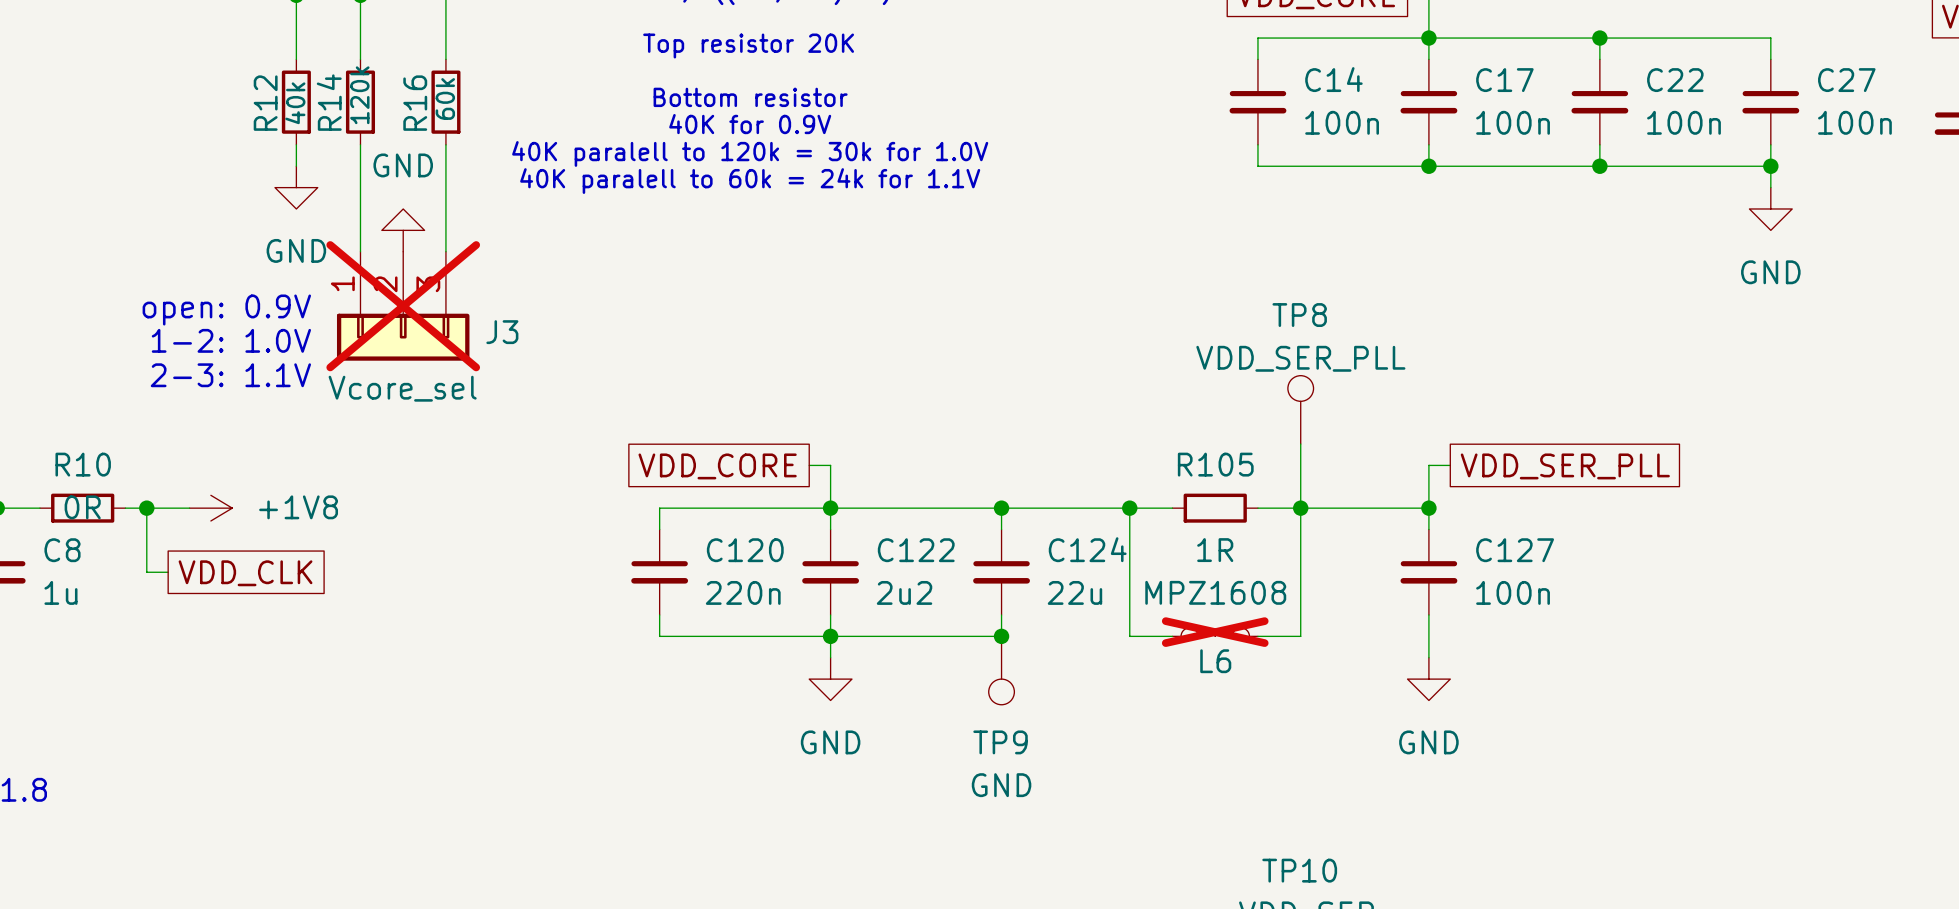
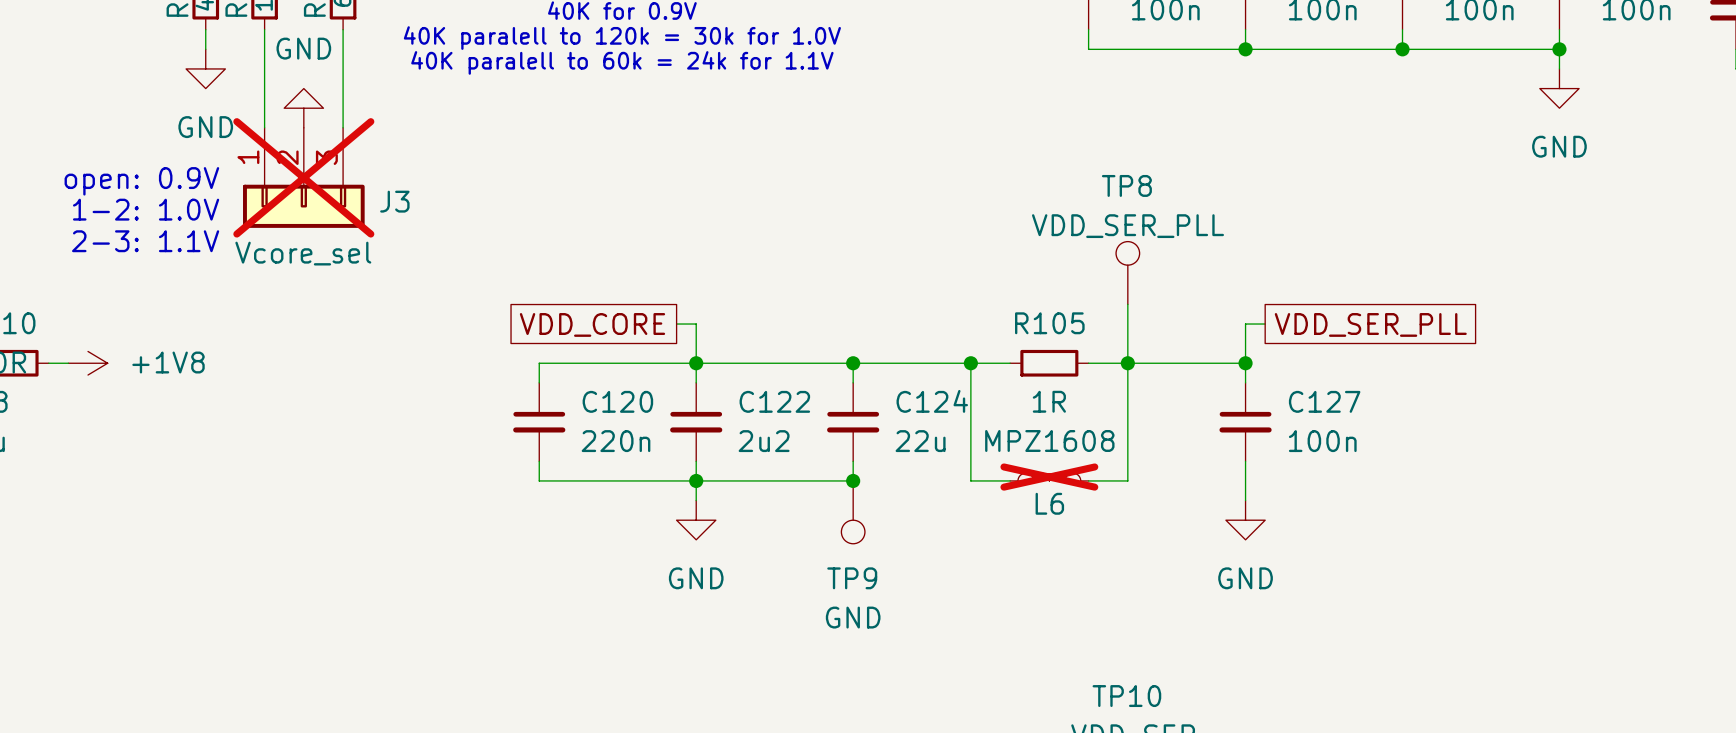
junction: (146, 508) -> none
wire: (189, 508) (146, 508) (146, 572) (168, 572) -> none
power symbol position: +1V8 (210, 508) -> +1V8 (88, 363)
global label: VDD_CLK (245, 573) -> none

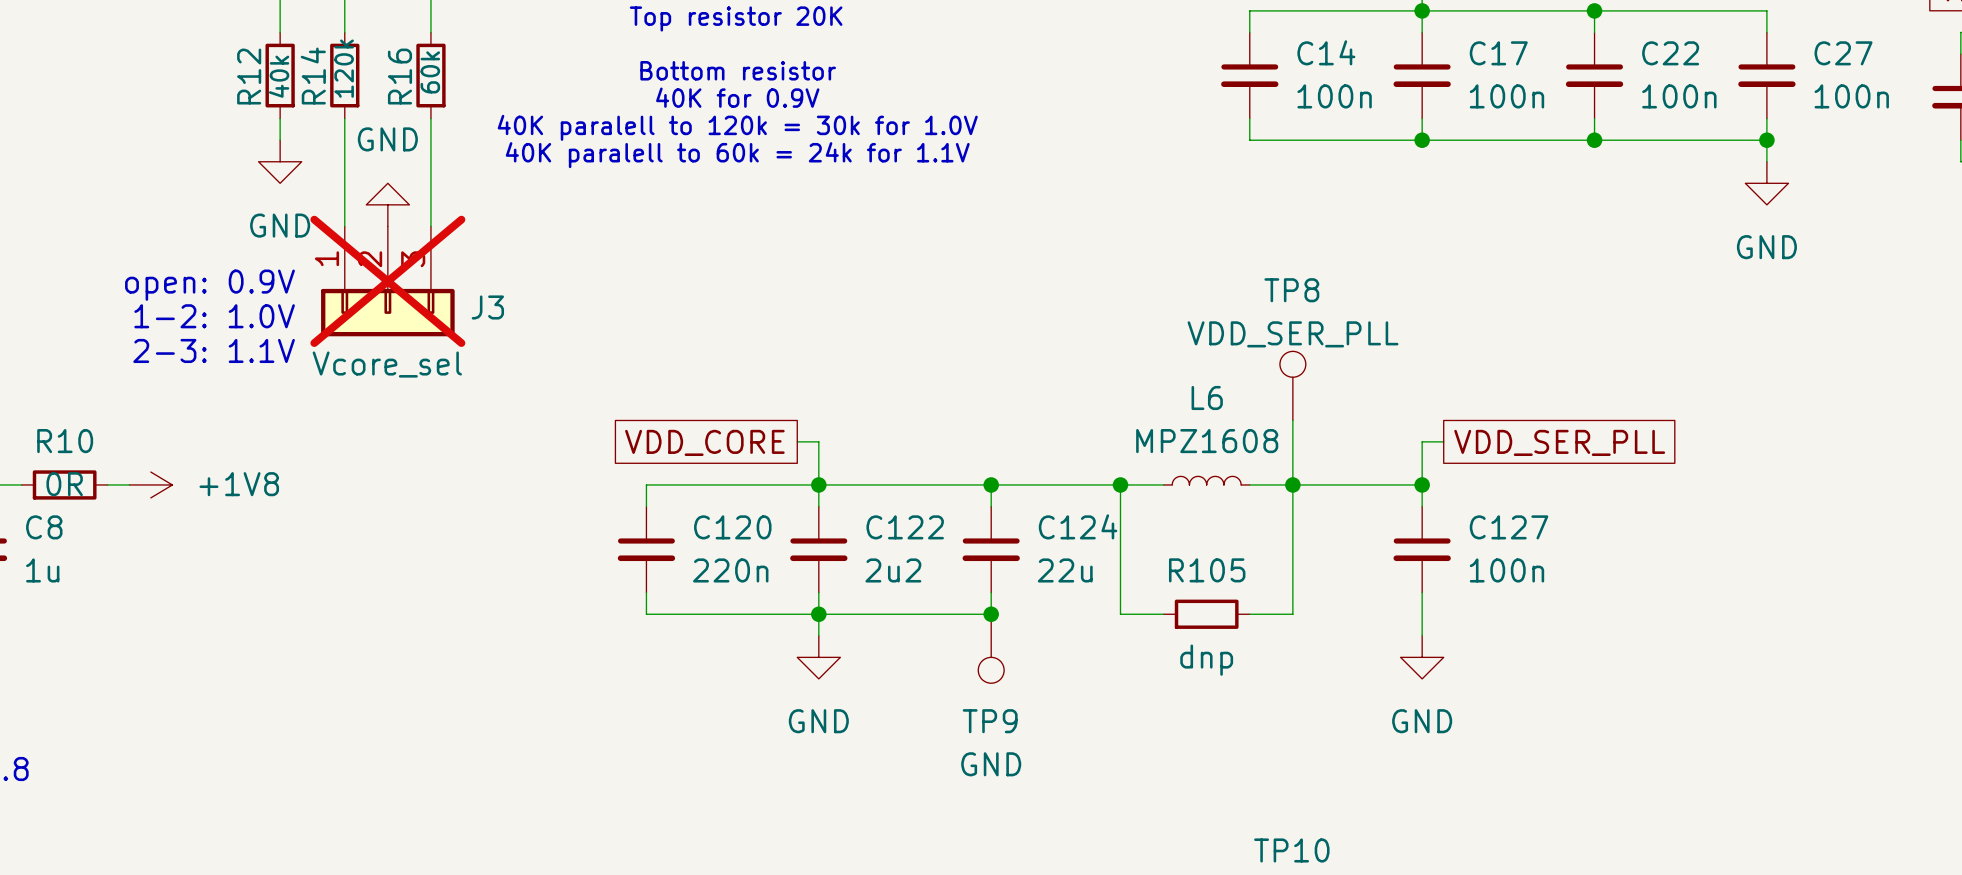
R105 position: (1049, 363) -> (1206, 614)
R105 value: 1R (1049, 401) -> dnp (1206, 660)
L6 position: (1049, 477) -> (1206, 480)
L6 do-not-place cross: (1049, 477) -> none
L6 name position: L6 (1049, 503) -> L6 (1207, 397)

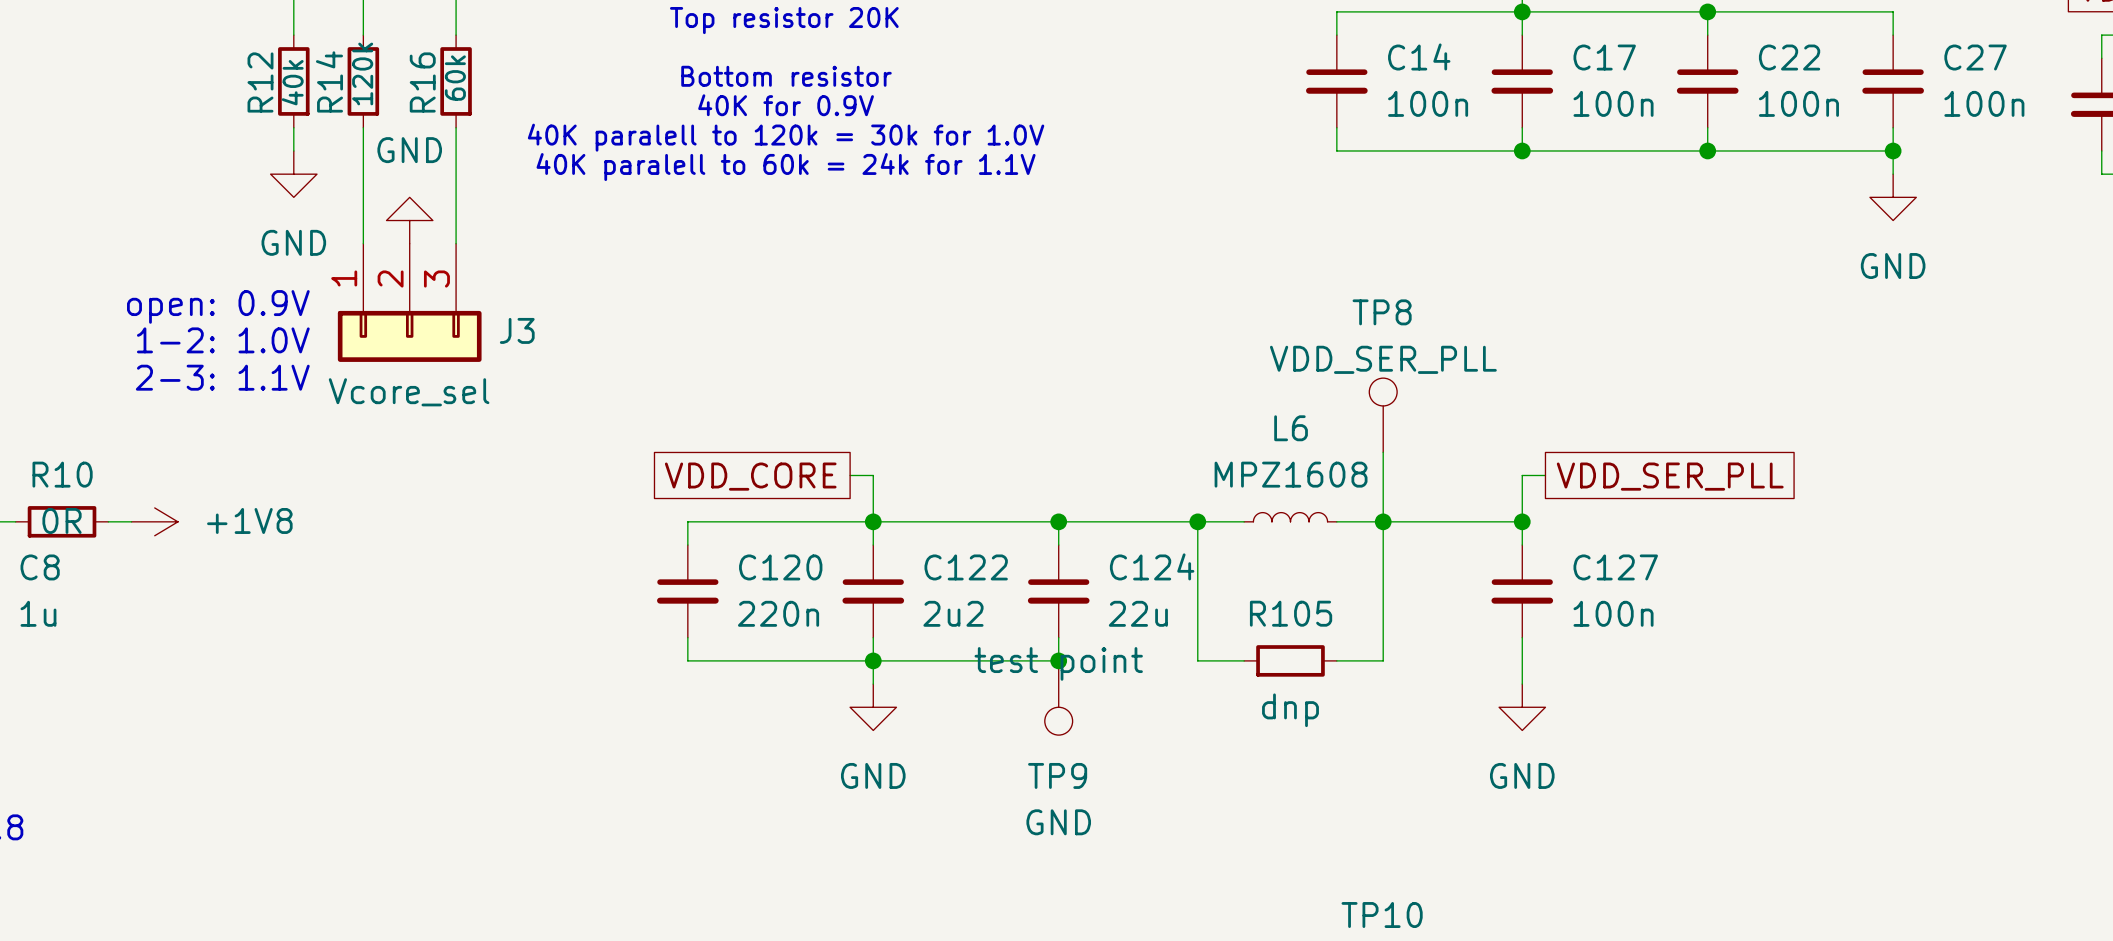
J3 do-not-place cross: (387, 281) -> none
TP9 text: none -> test point (1058, 663)

